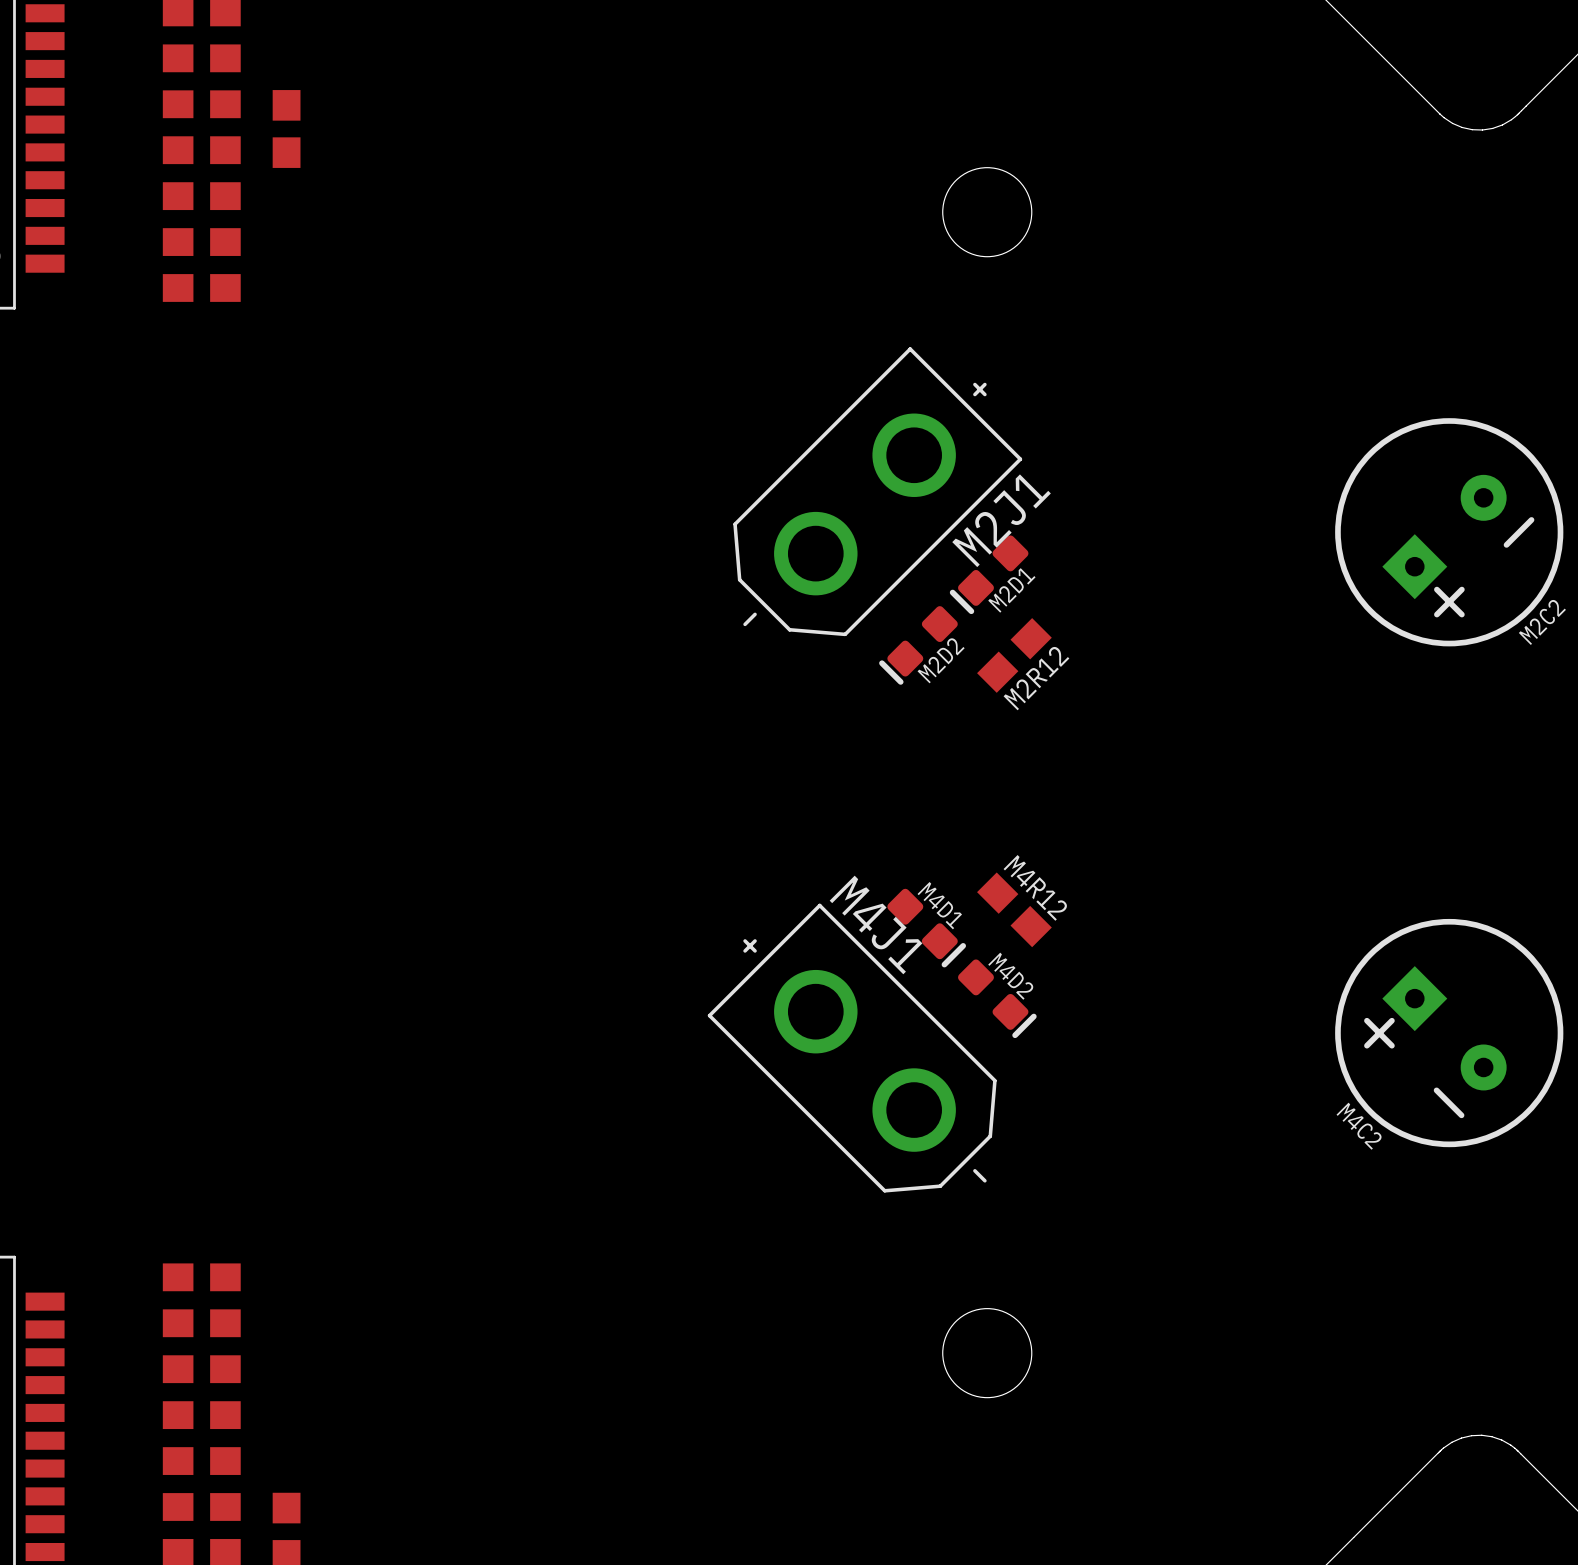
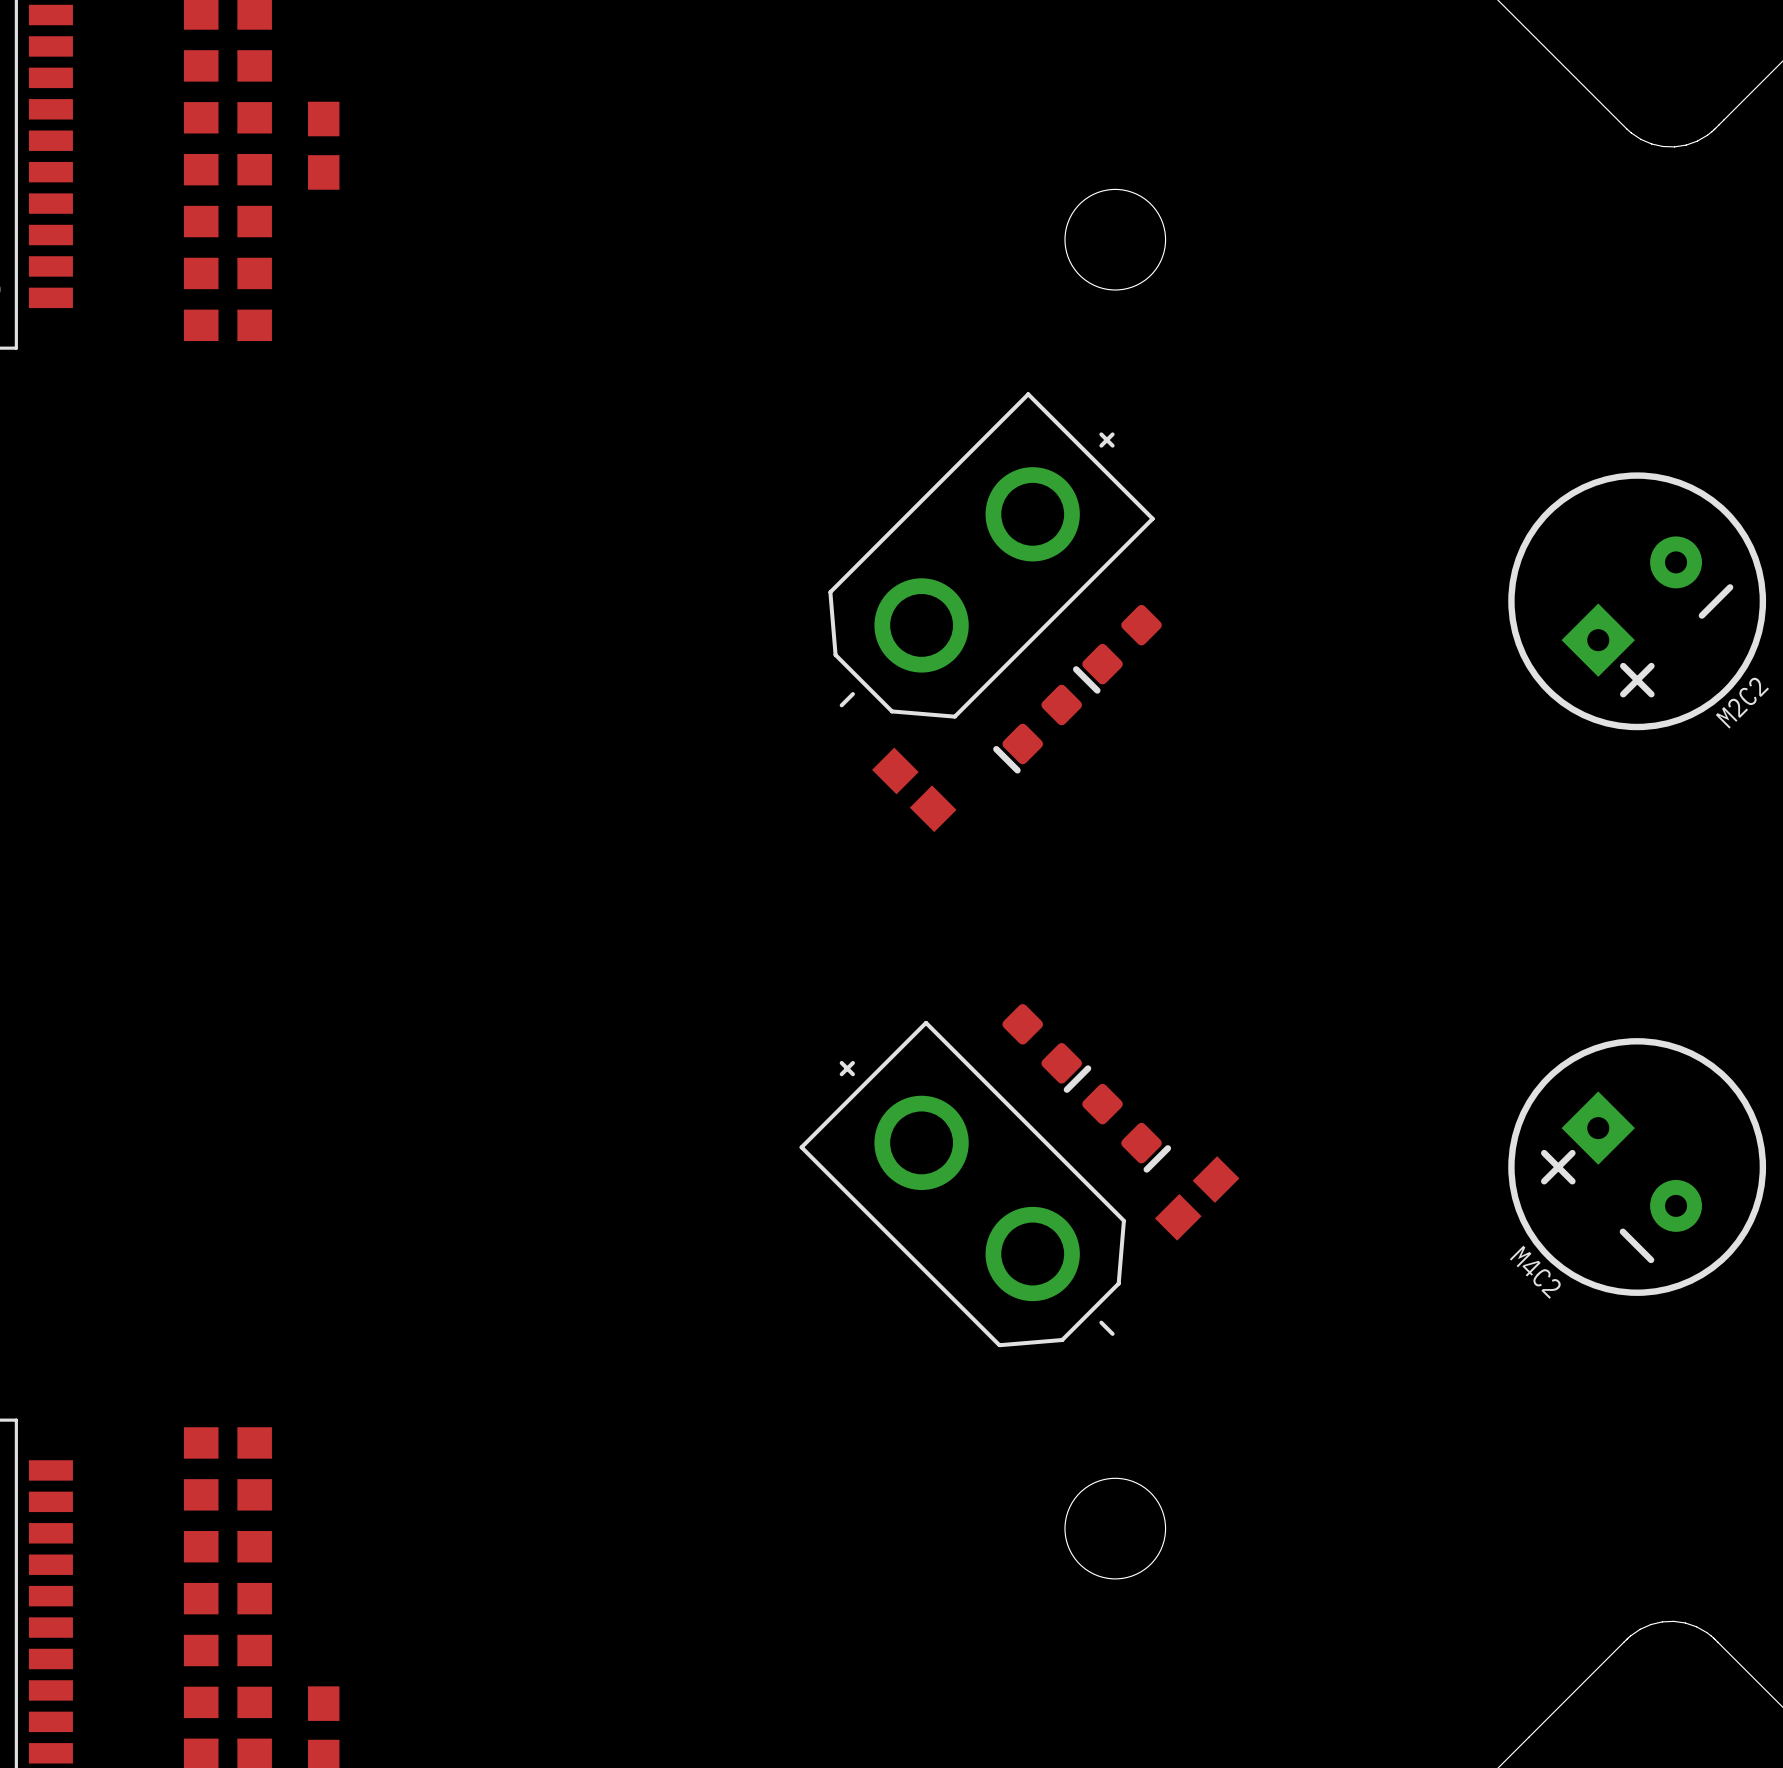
M2J1 name: M2J1 (1001, 520) -> none
M2D1 name: M2D1 (1011, 590) -> none
M2R12: (1014, 655) -> none
M2D2 name: M2D2 (941, 660) -> none
part: none -> (914, 789)
M4D1 name: M4D1 (939, 905) -> none
M4R12: (1014, 909) -> none
M4J1 name: M4J1 (876, 924) -> none
M4D2 name: M4D2 (1010, 976) -> none
part: none -> (1197, 1198)

